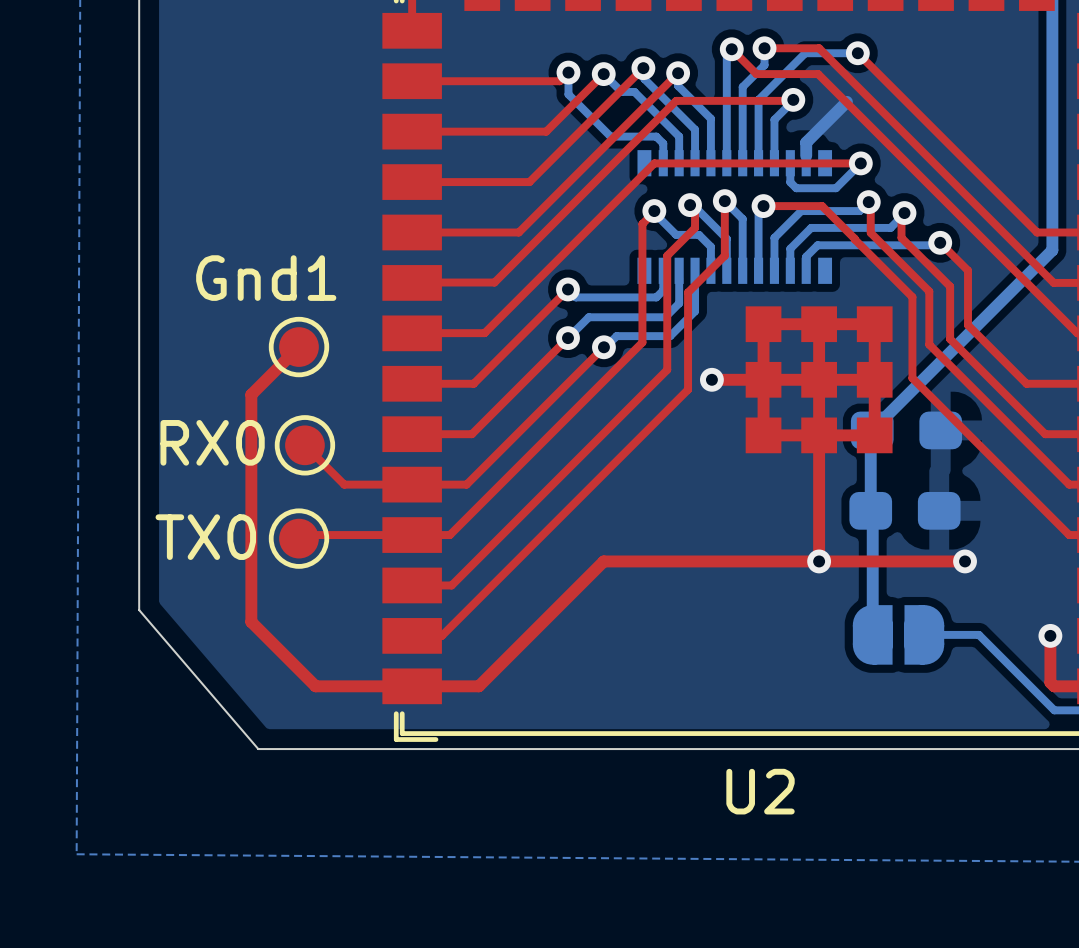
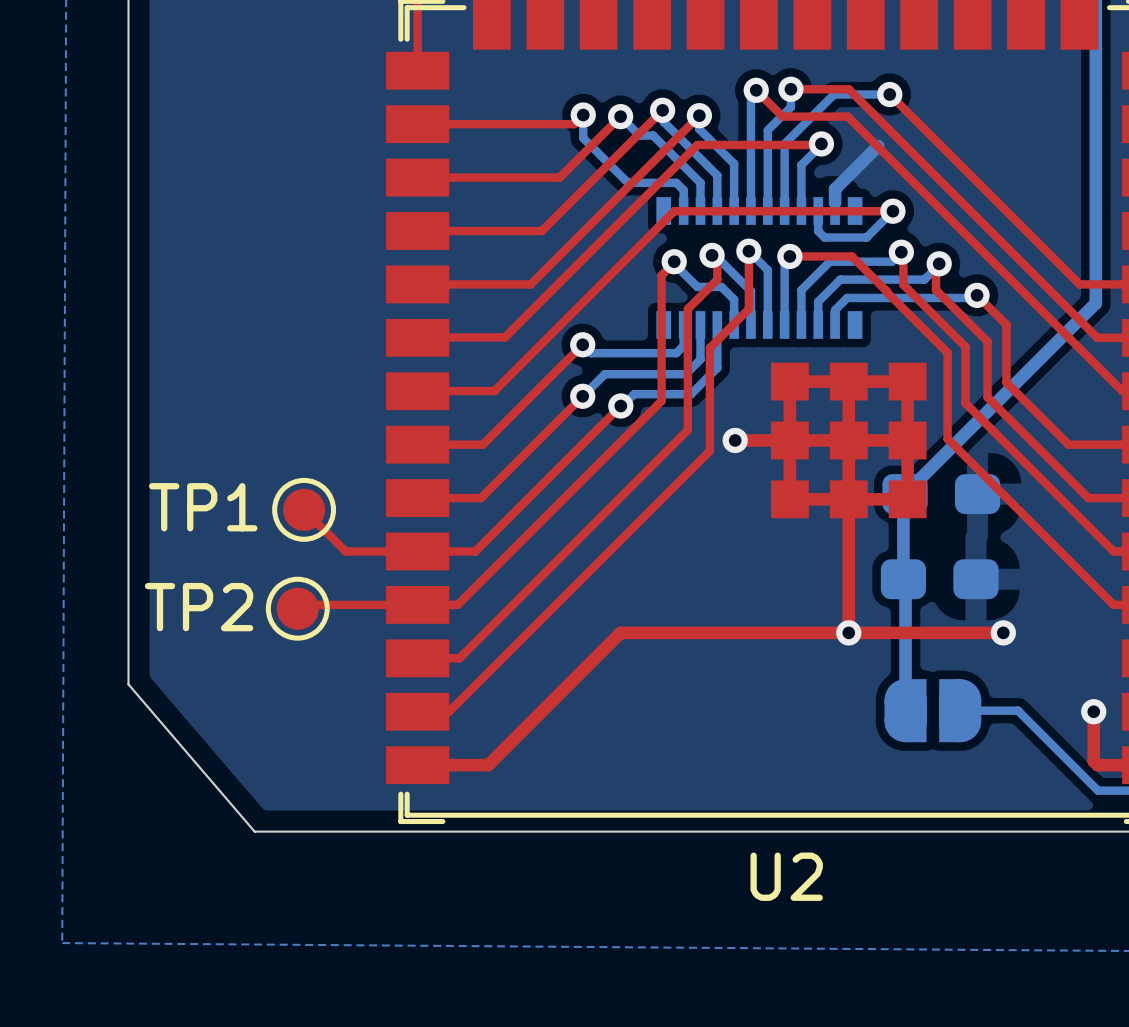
top track: (298, 347) (251, 394) (251, 621) (315, 686) (412, 686) -> none
Gnd1: (298, 347) -> none
RX0 name: RX0 (212, 442) -> TP1 (203, 507)
TX0 name: TX0 (205, 537) -> TP2 (199, 607)

